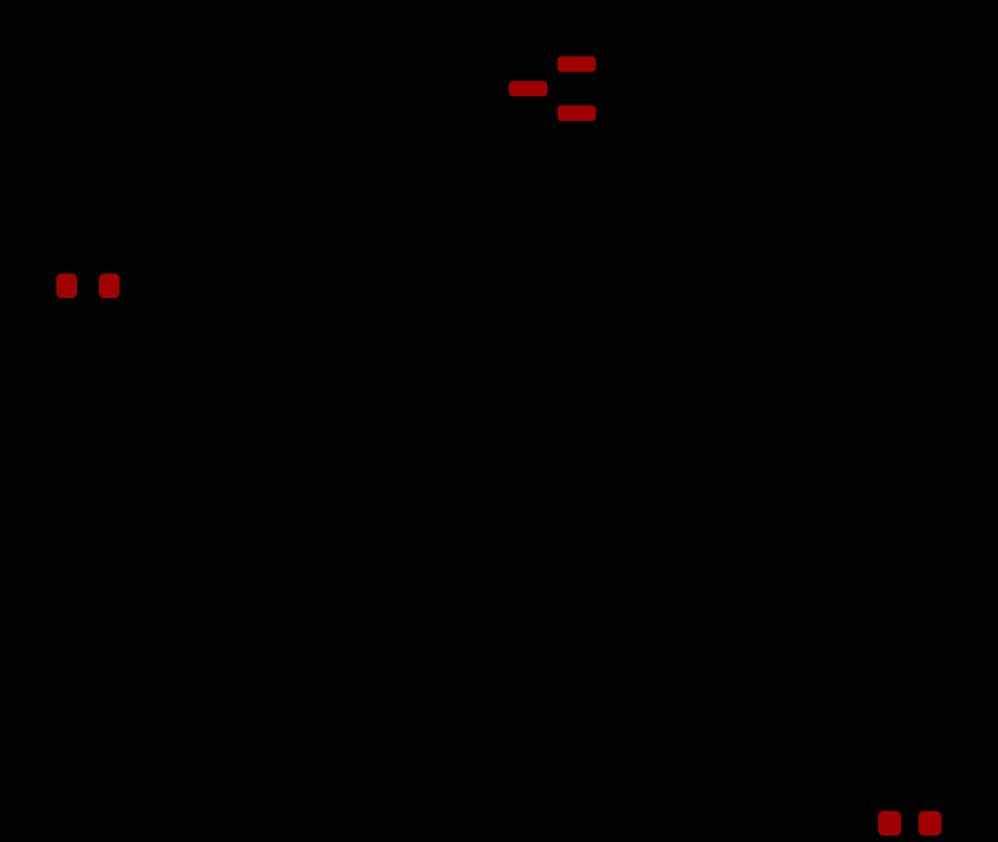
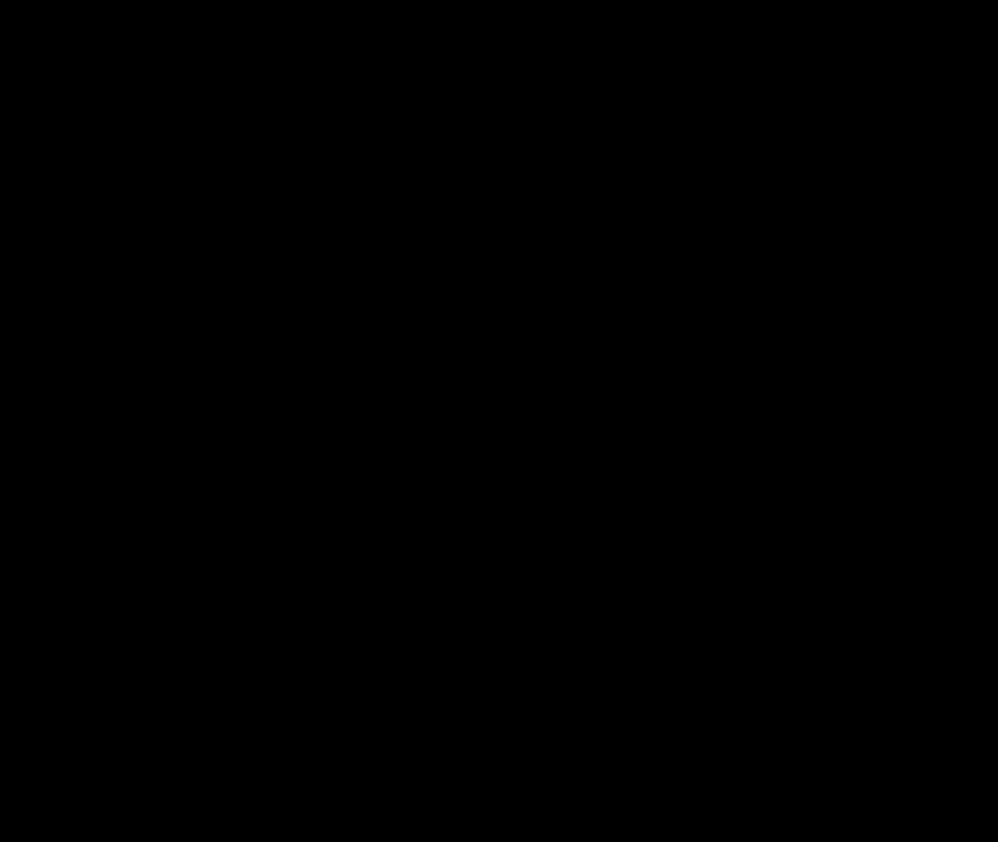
part: (552, 88) -> none
part: (87, 285) -> none
part: (909, 823) -> none

